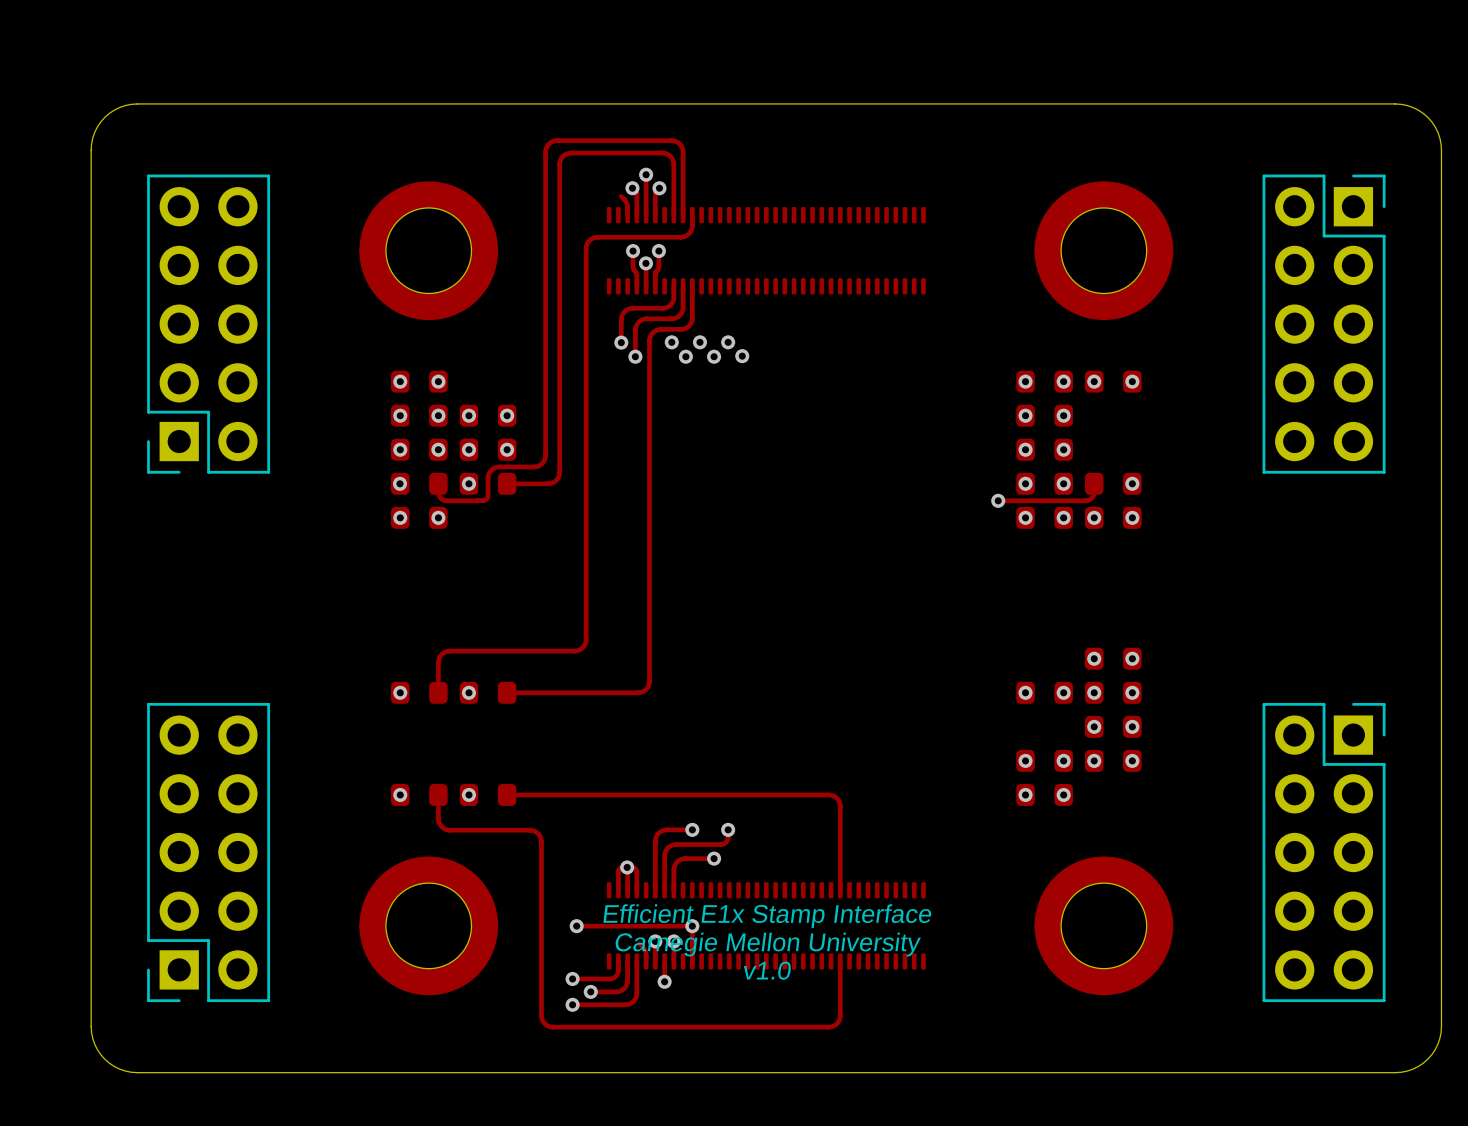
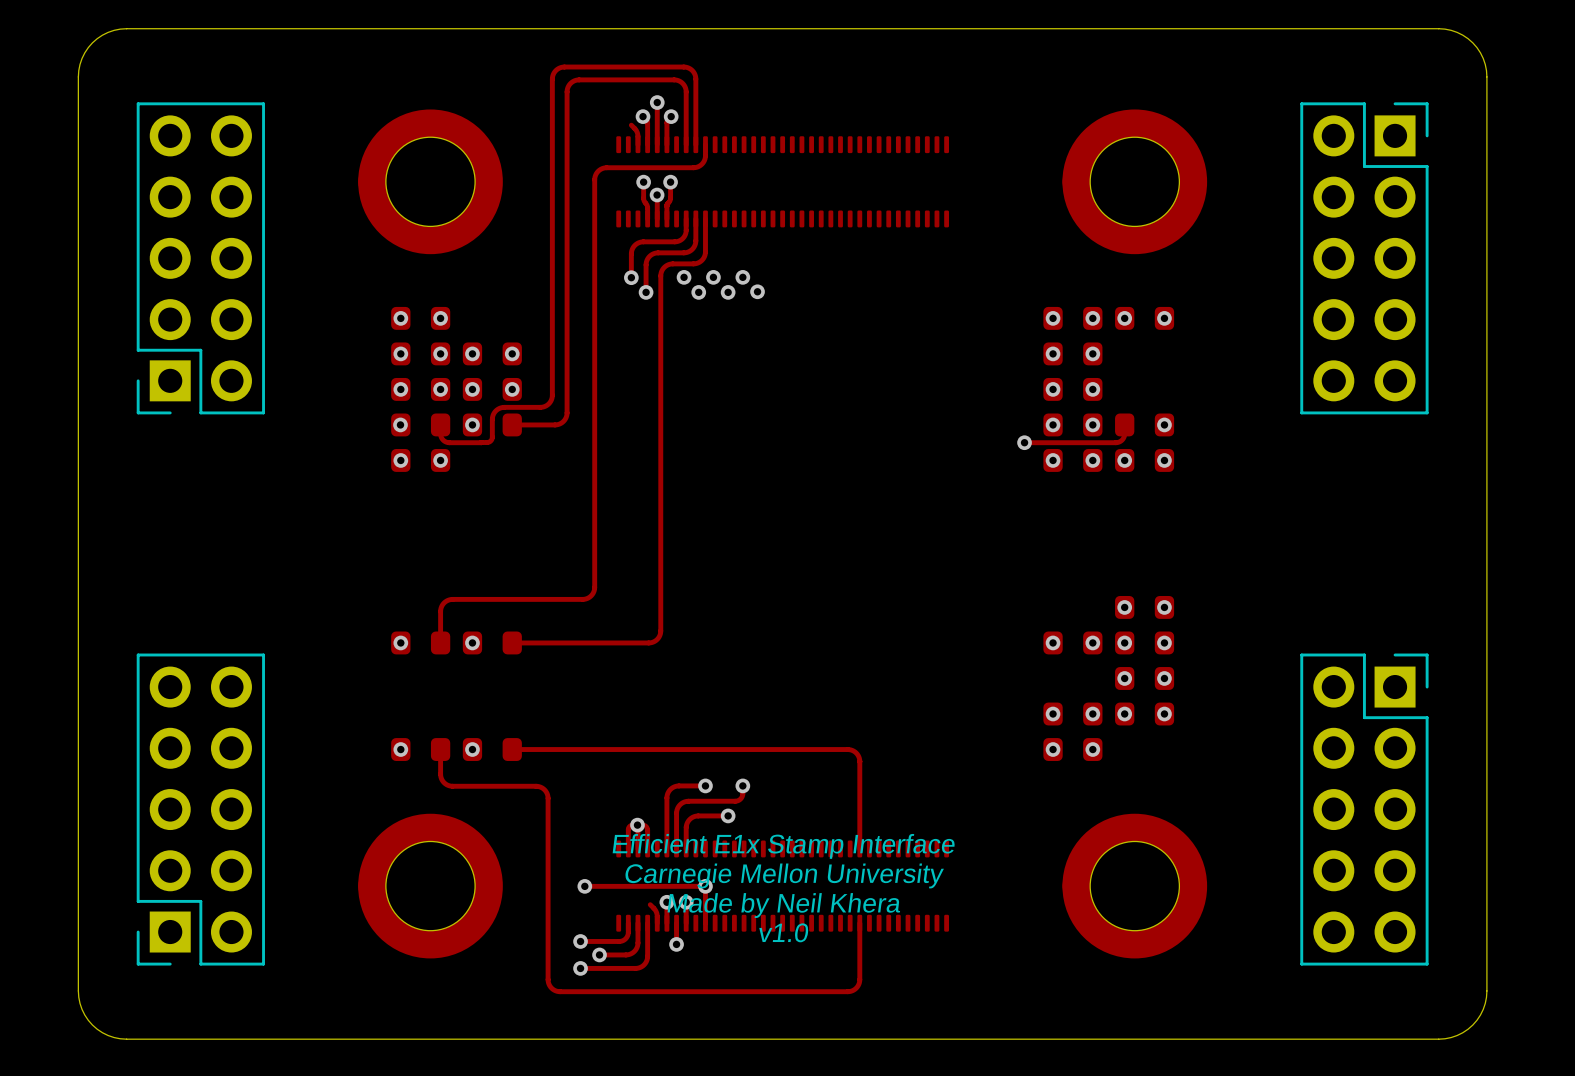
text: none -> Efficient E1x Stamp Interface (784, 846)
text: Efficient E1x Stamp Interface (767, 916) -> Carnegie Mellon University (784, 875)
text: Carnegie Mellon University (768, 944) -> Made by Neil Khera (783, 905)

